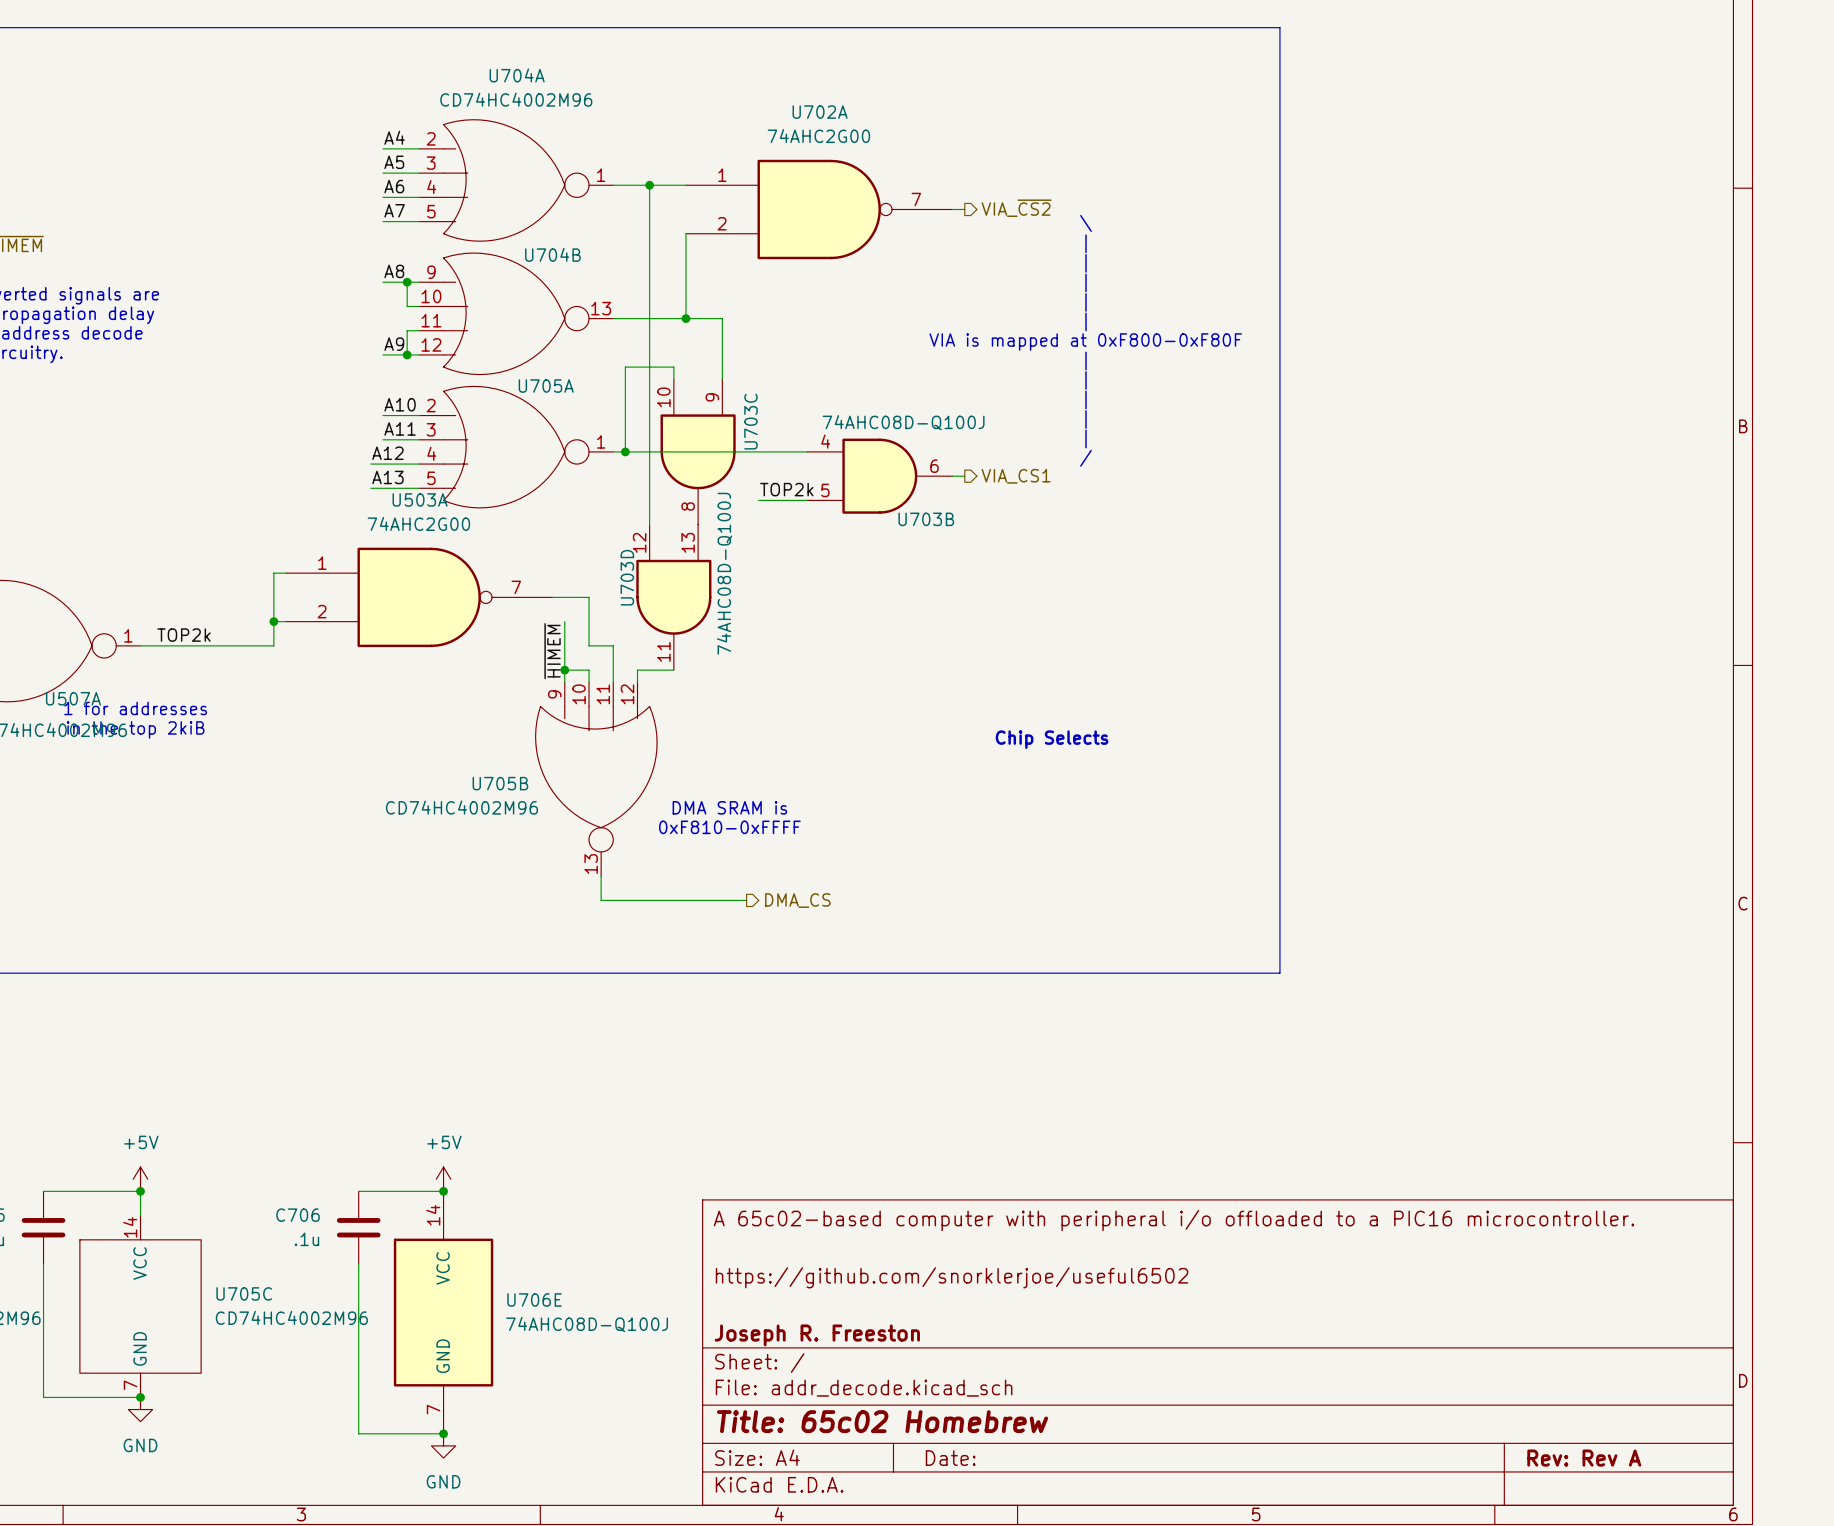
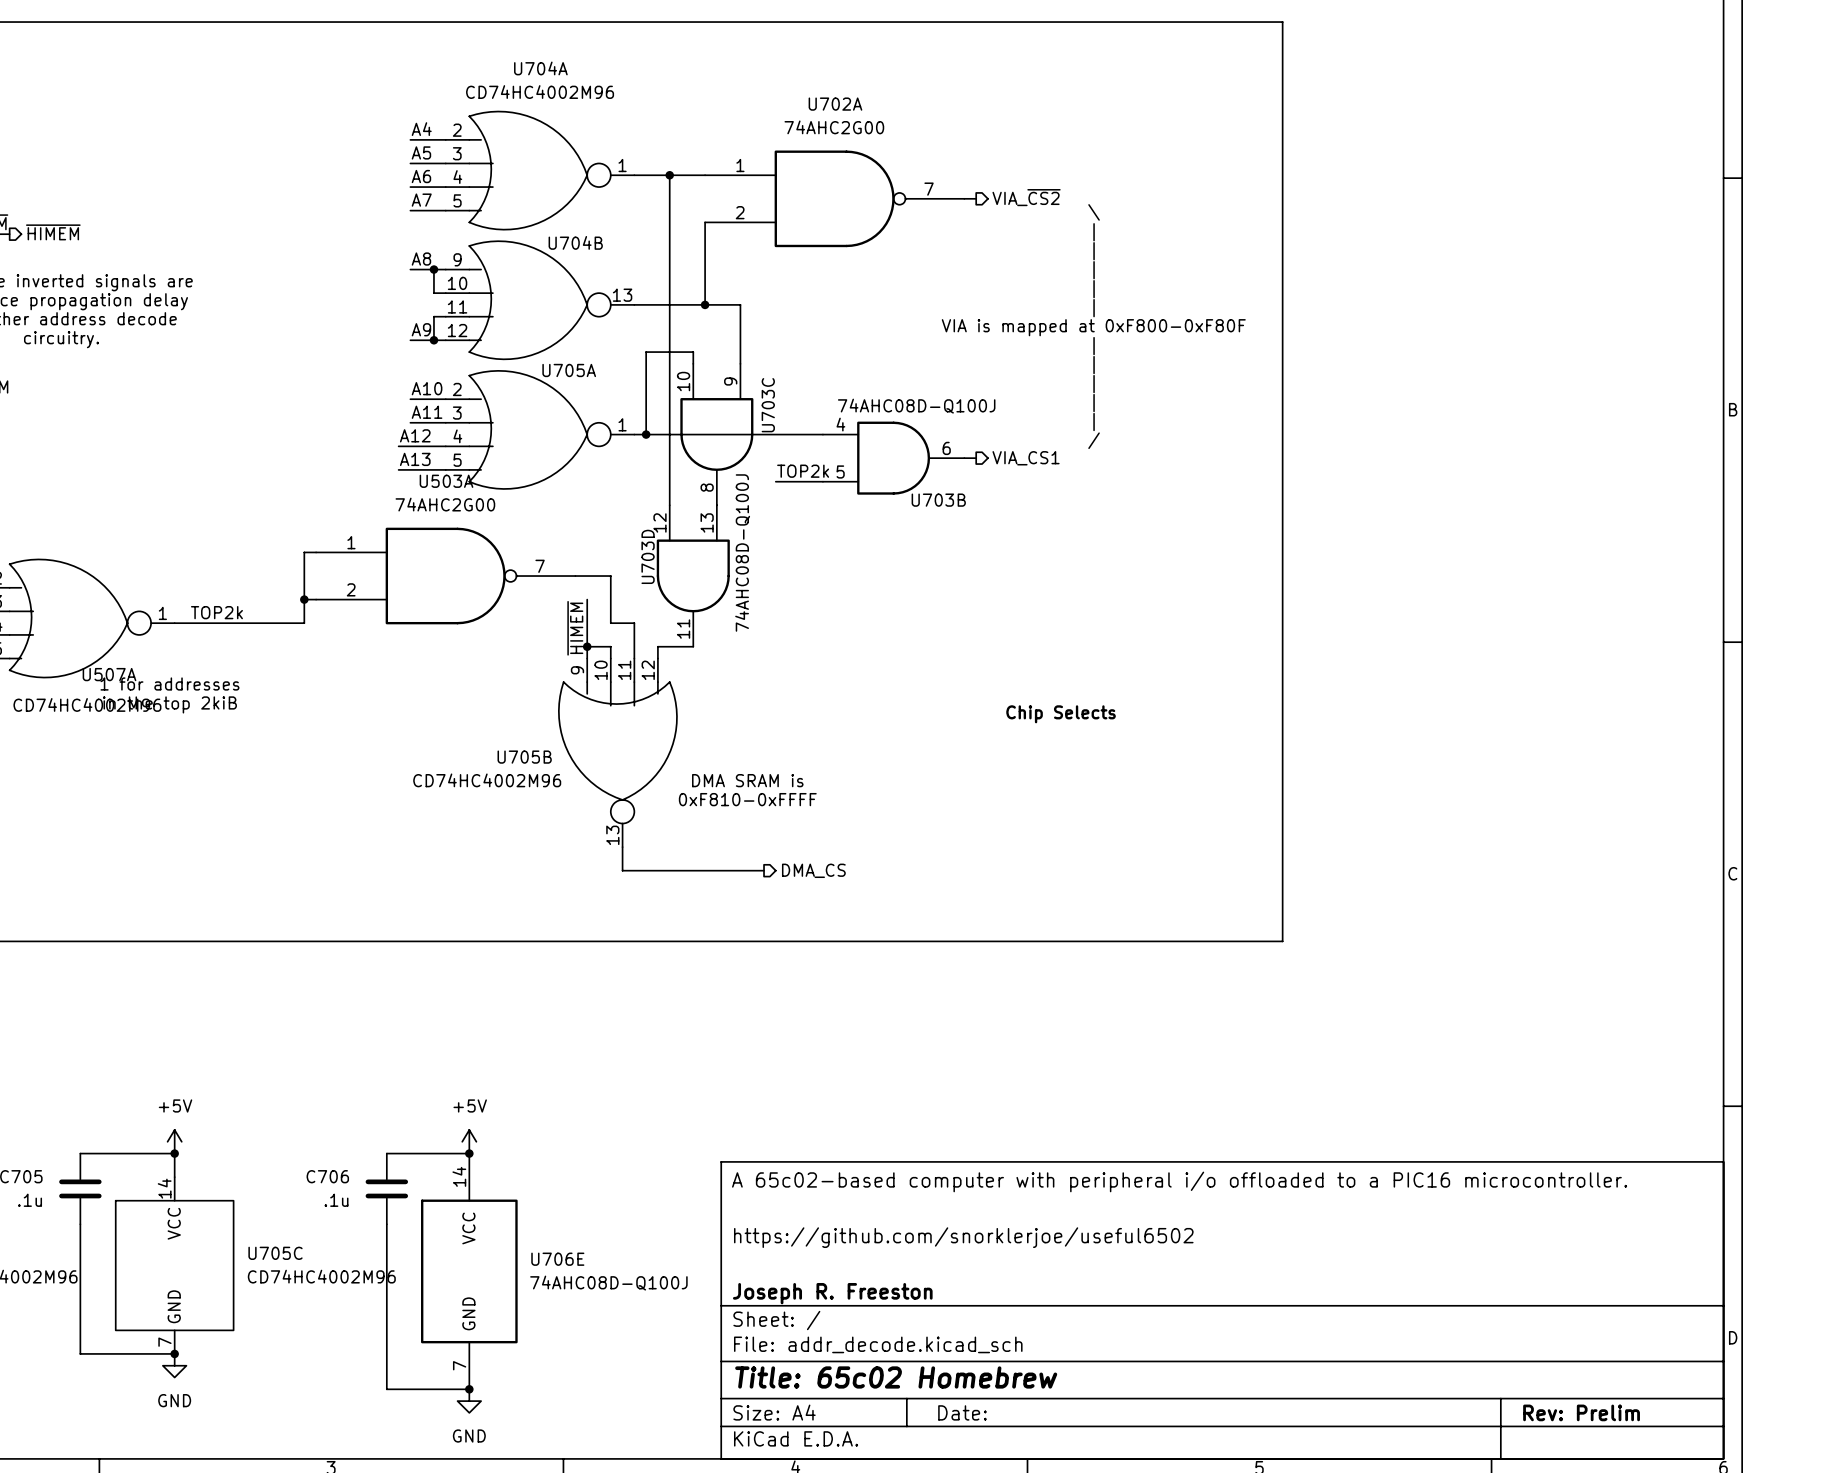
title block: Rev: Rev A (1584, 1458) -> Rev: Prelim (1581, 1412)

